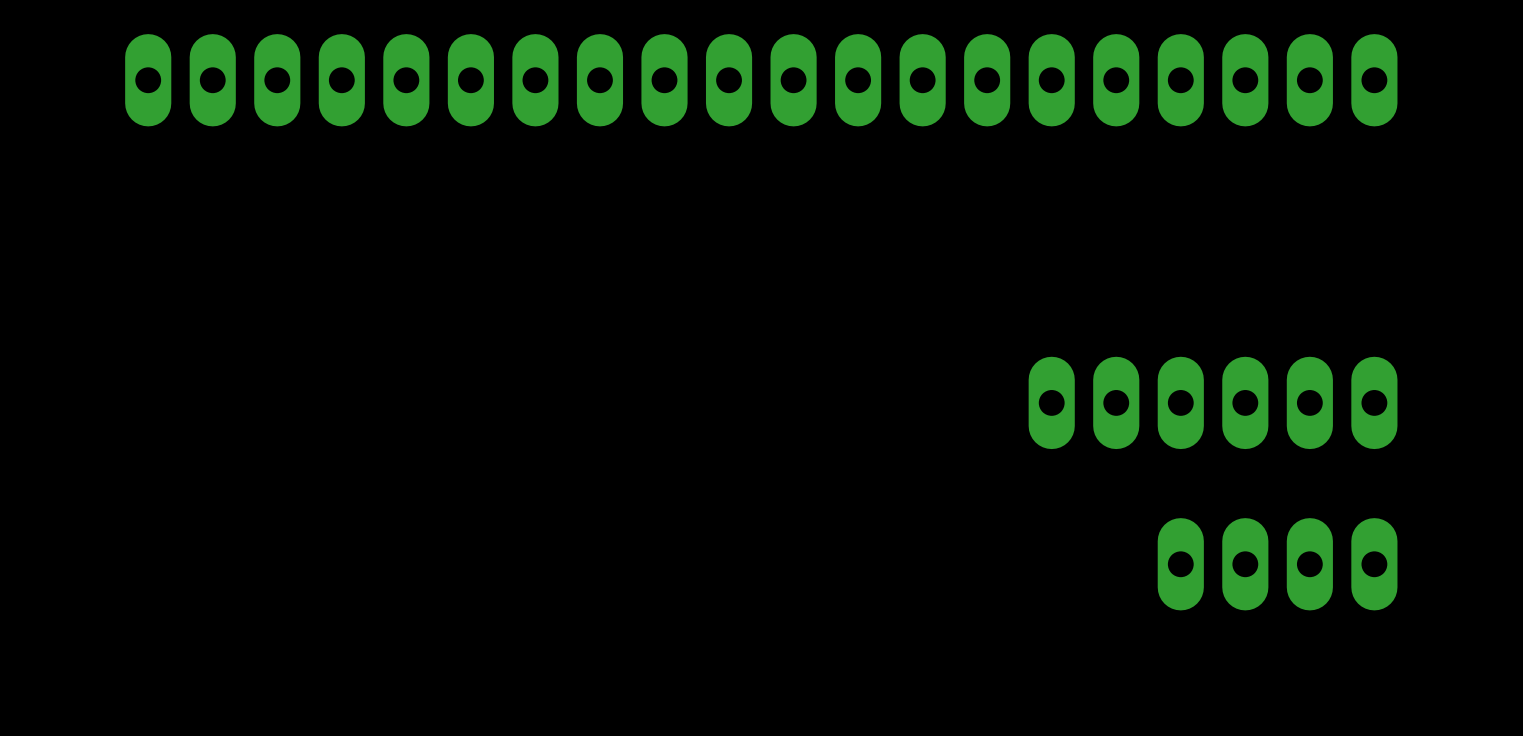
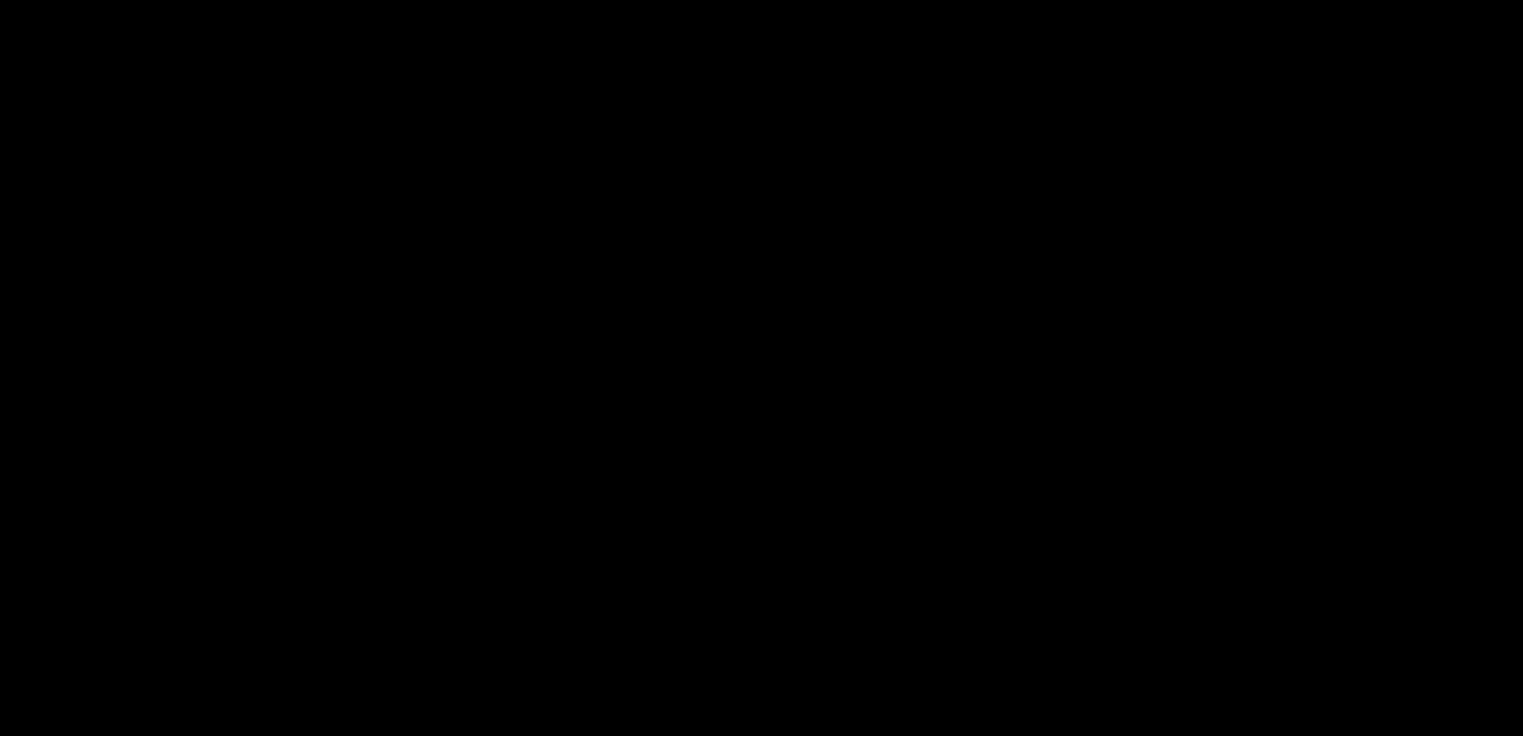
part: (761, 80) -> none
part: (1213, 402) -> none
part: (1277, 564) -> none

